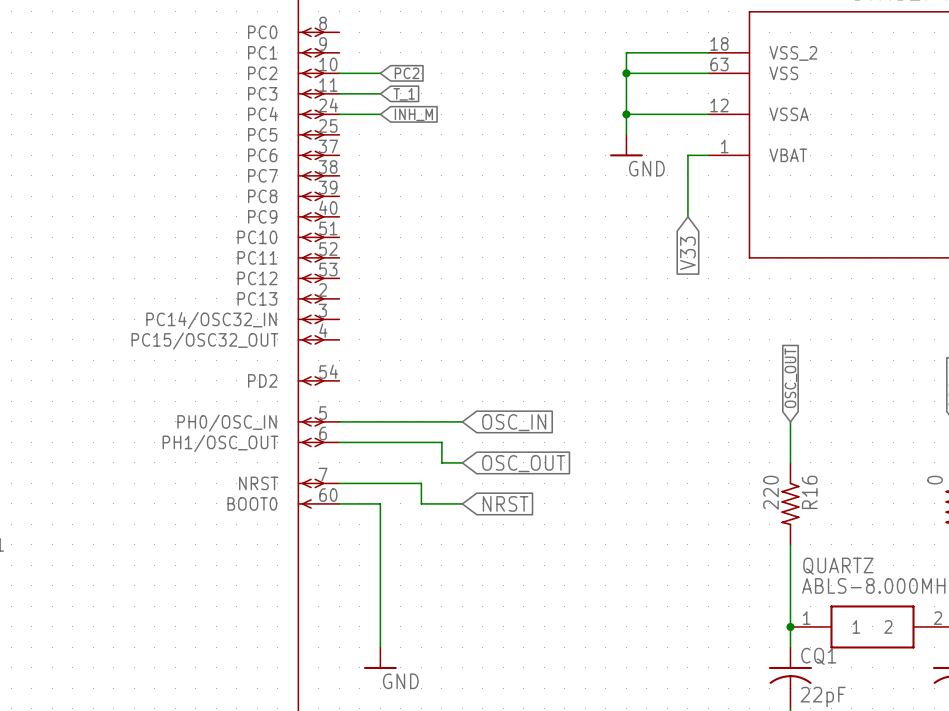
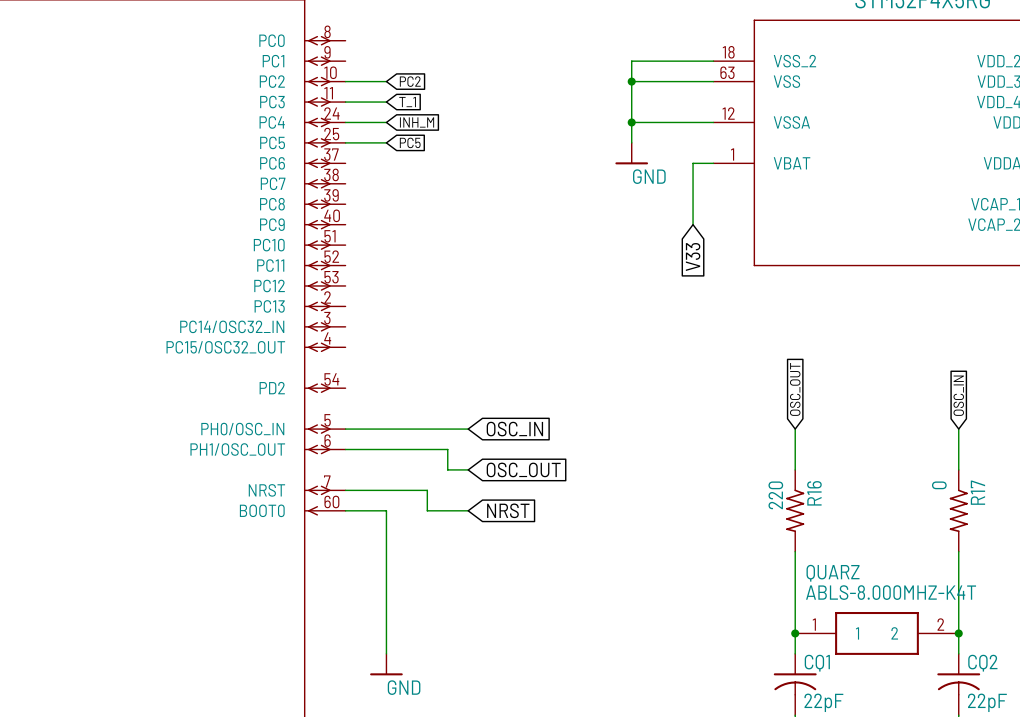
wire: none -> (345, 142) (386, 142)
global label: none -> PC5 (410, 142)
QUARTZ name: QUARTZ (838, 566) -> QUARZ (833, 573)

